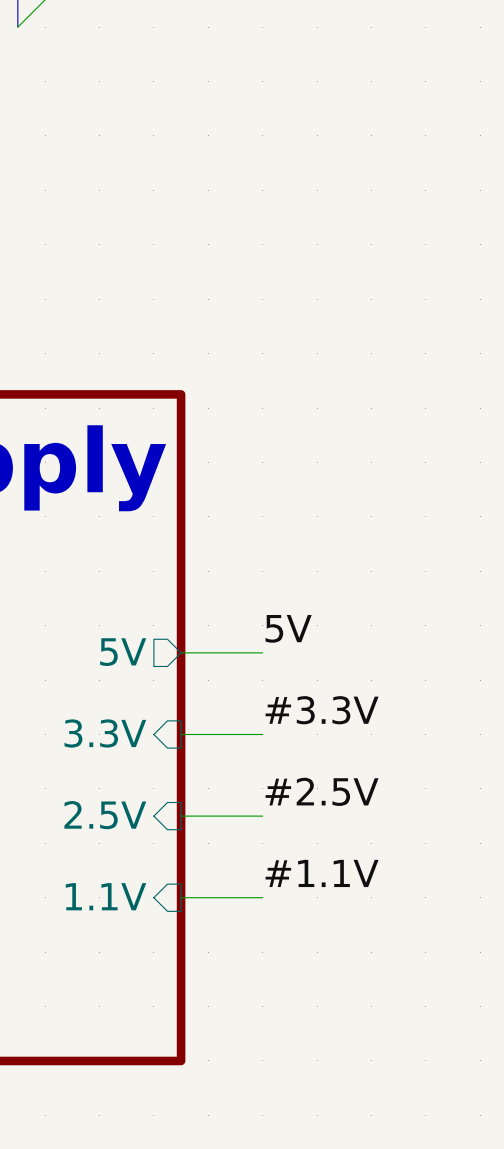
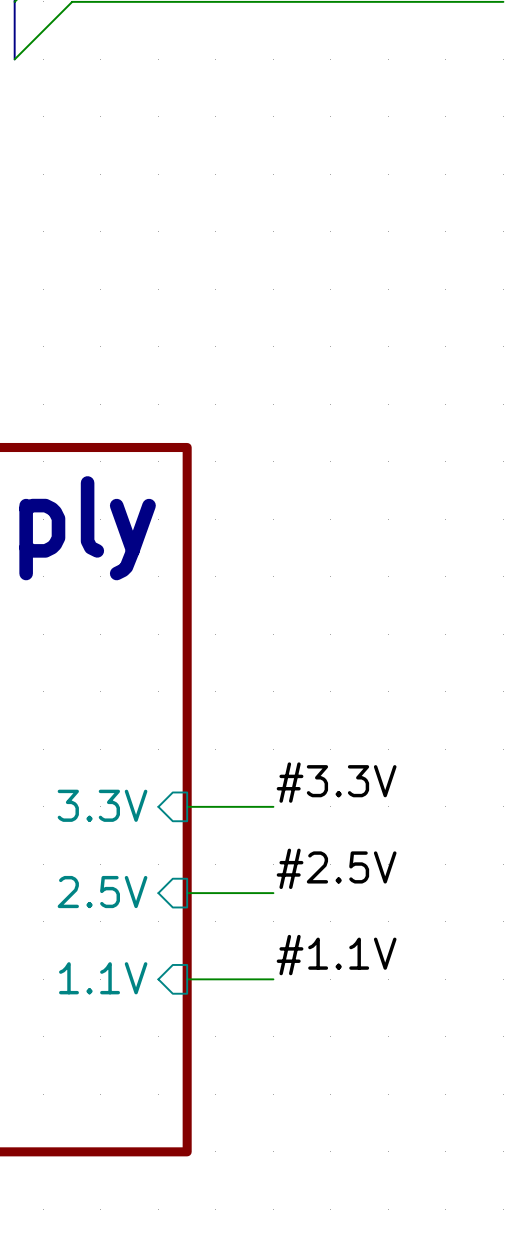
label: 5V (288, 628) -> none
sheet pin: 5V (123, 652) -> none
wire: (181, 652) (262, 652) -> none

